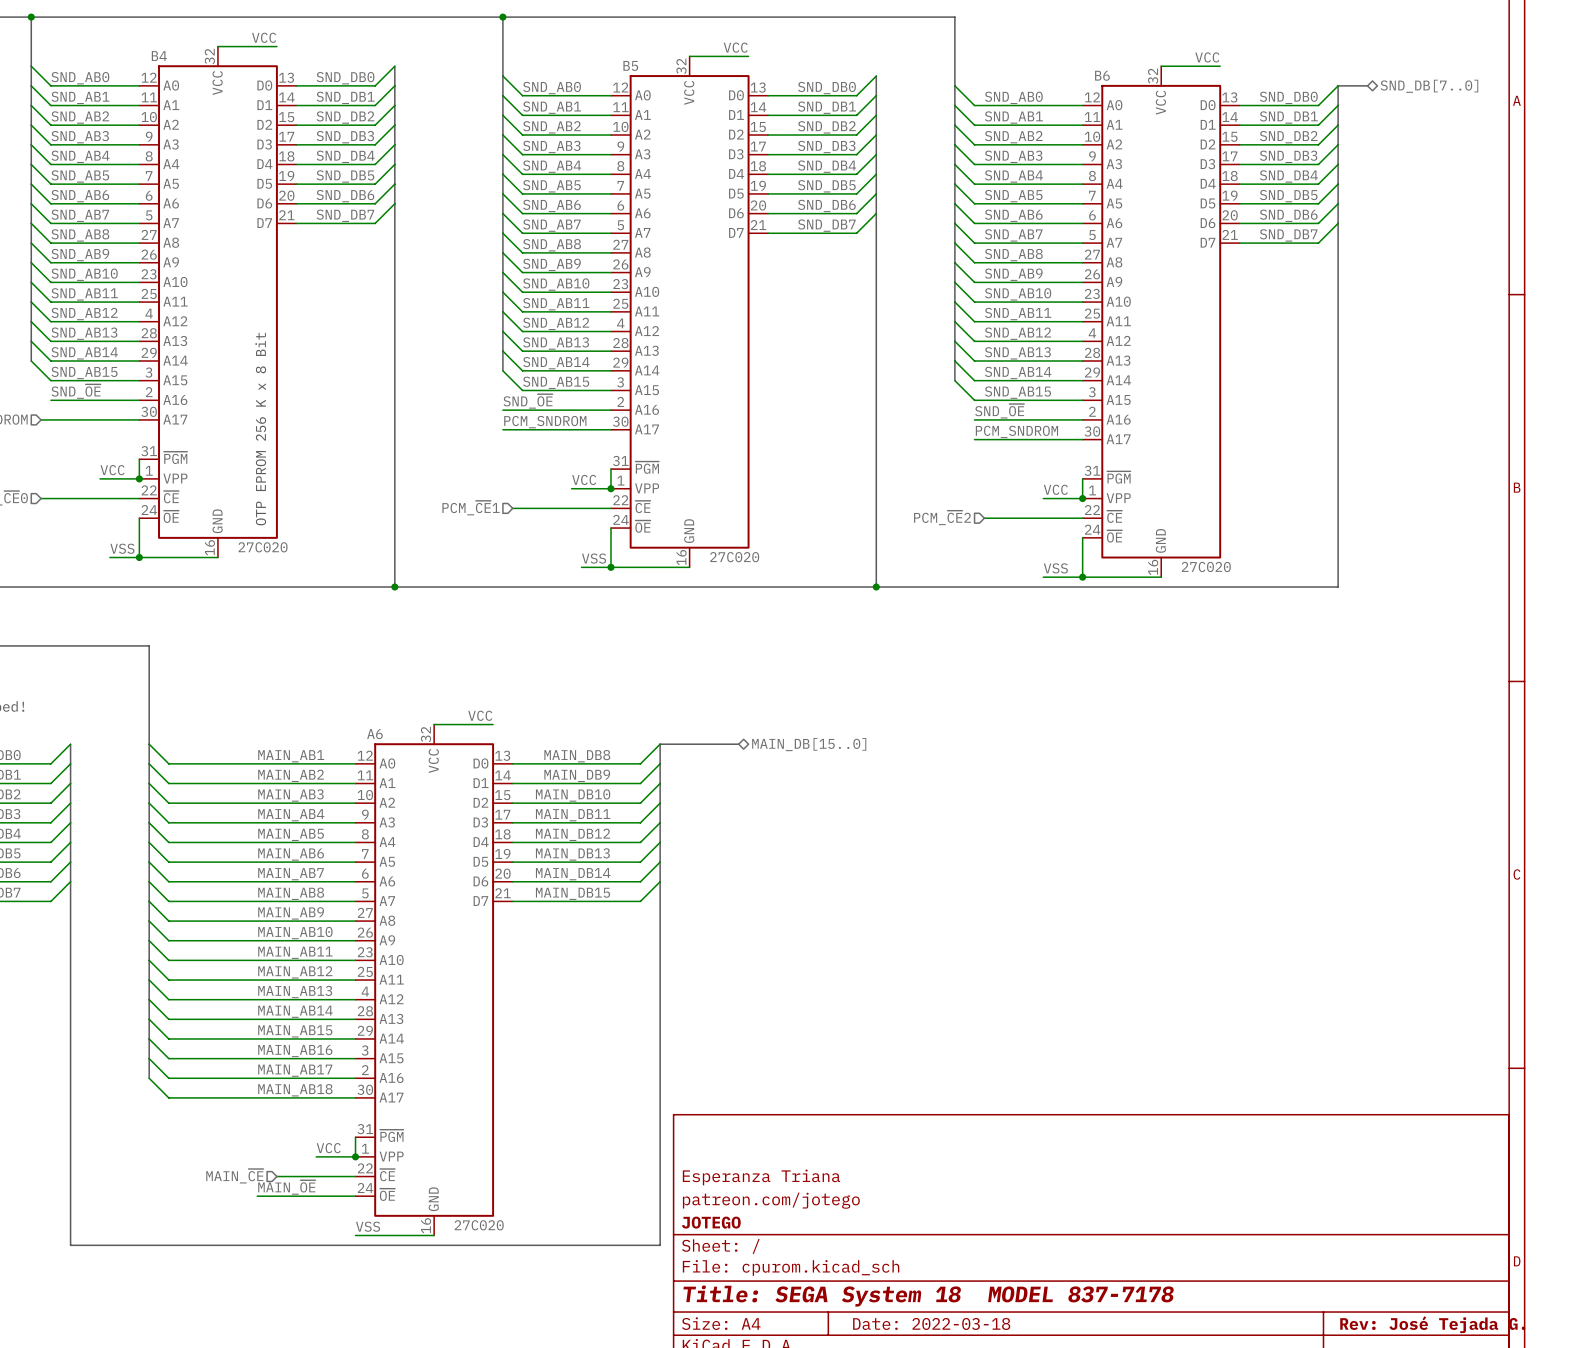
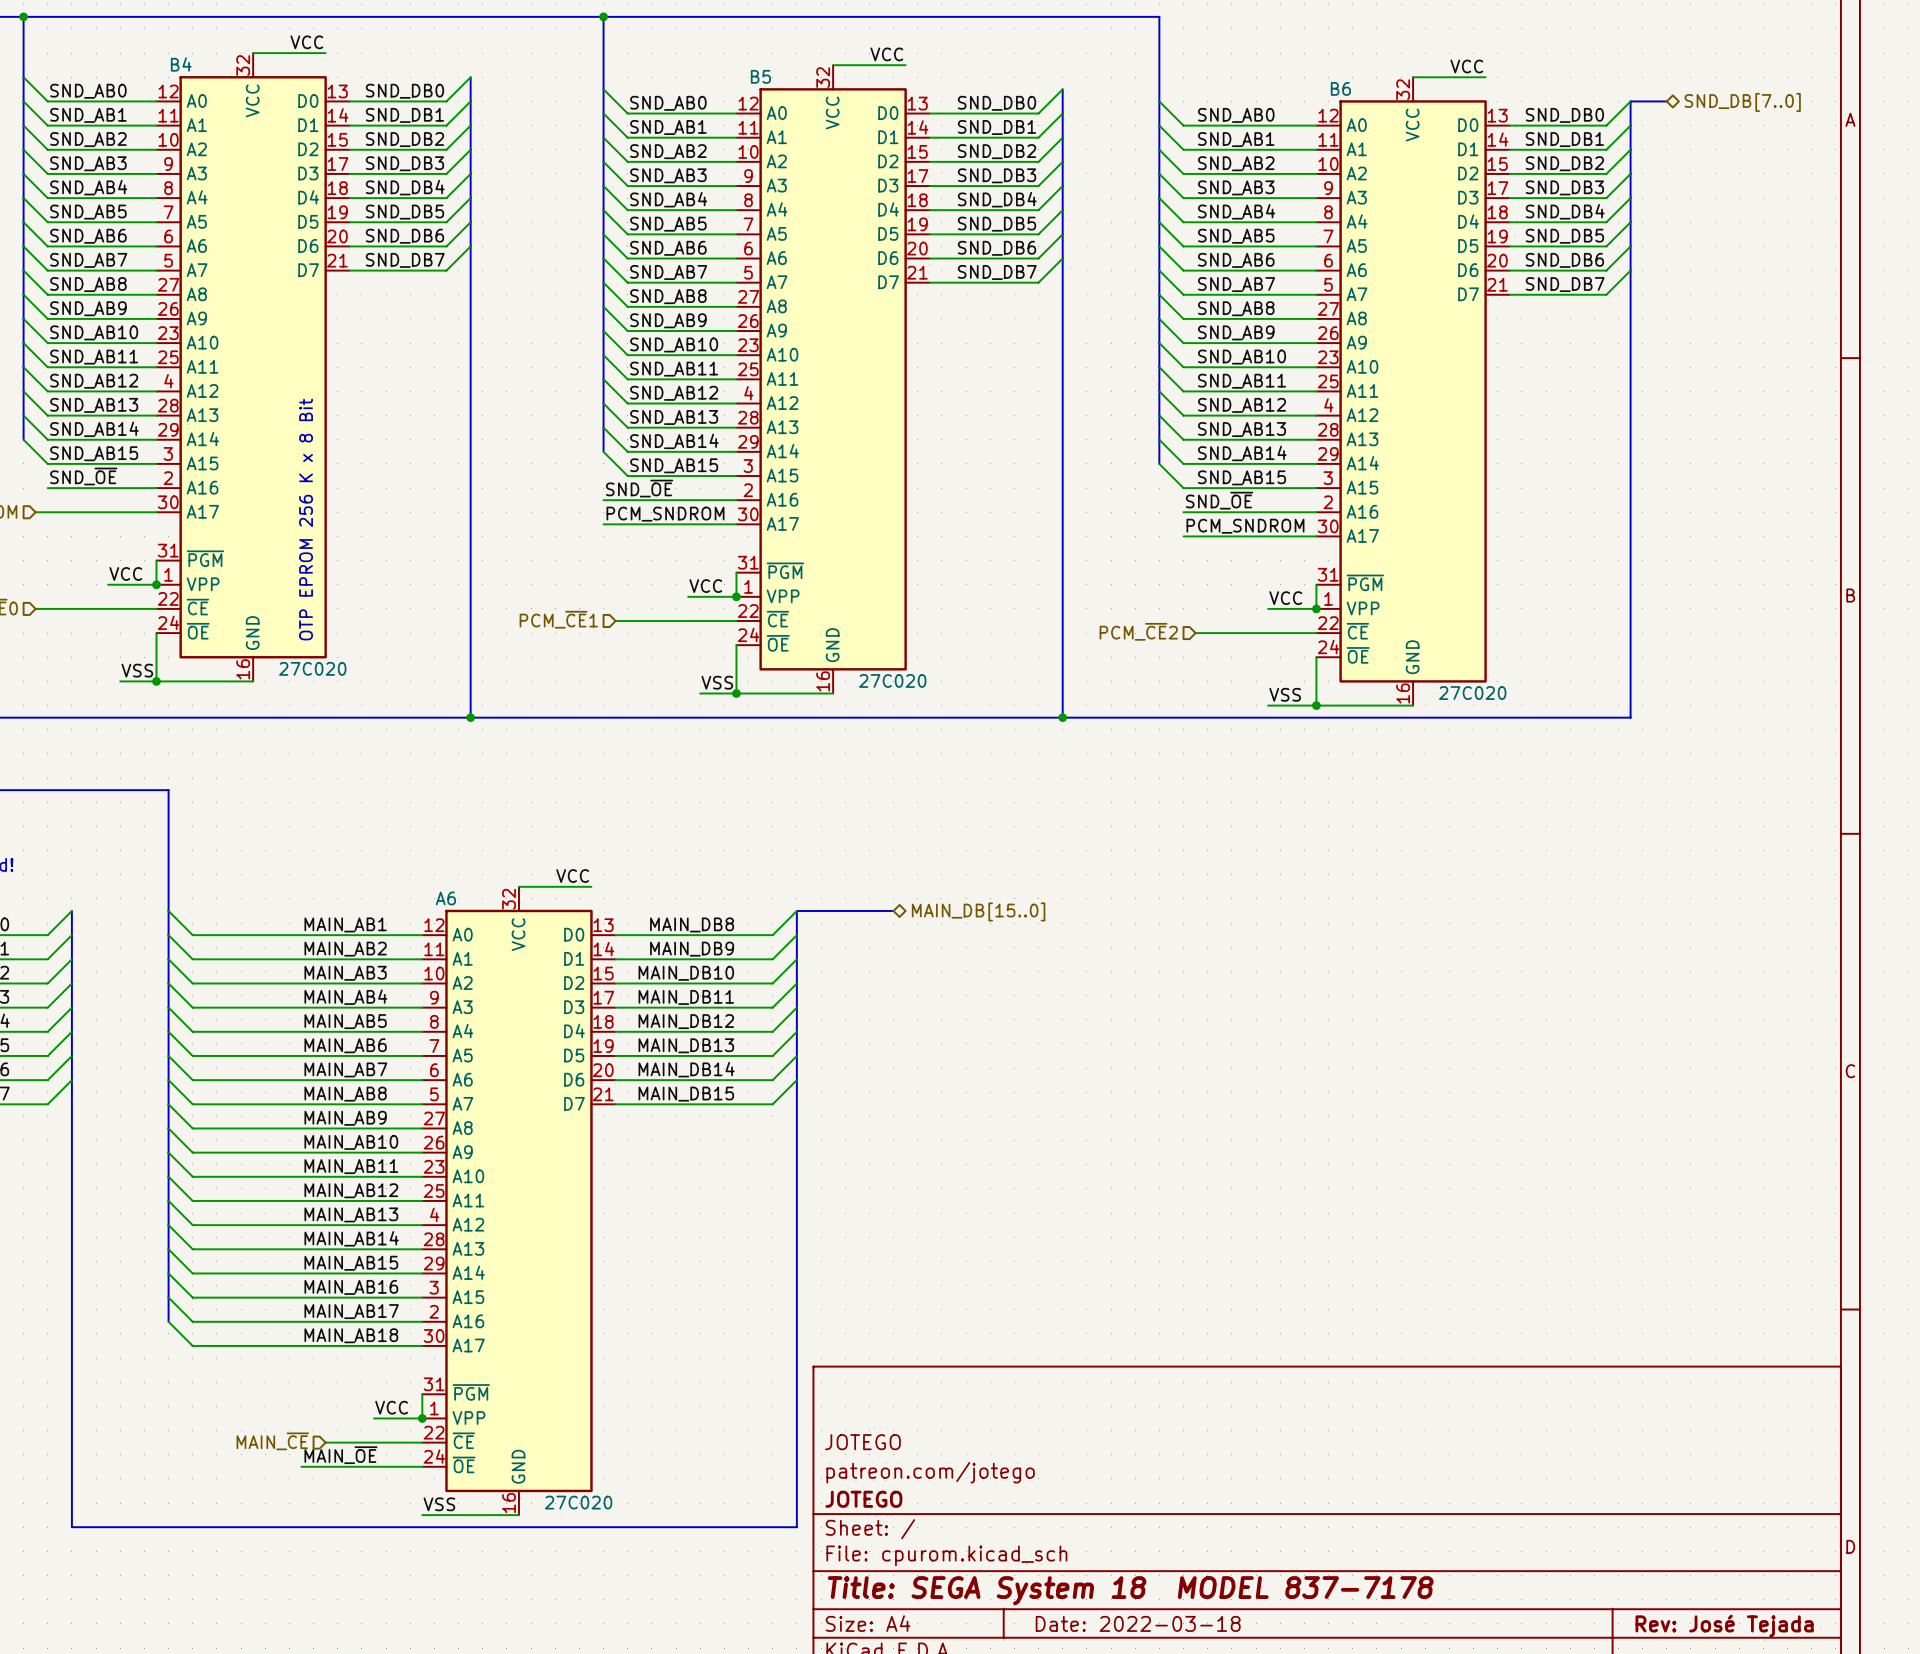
title block: Esperanza Triana (761, 1177) -> JOTEGO (862, 1442)
title block: Rev: José Tejada G. (1432, 1324) -> Rev: José Tejada (1724, 1625)

